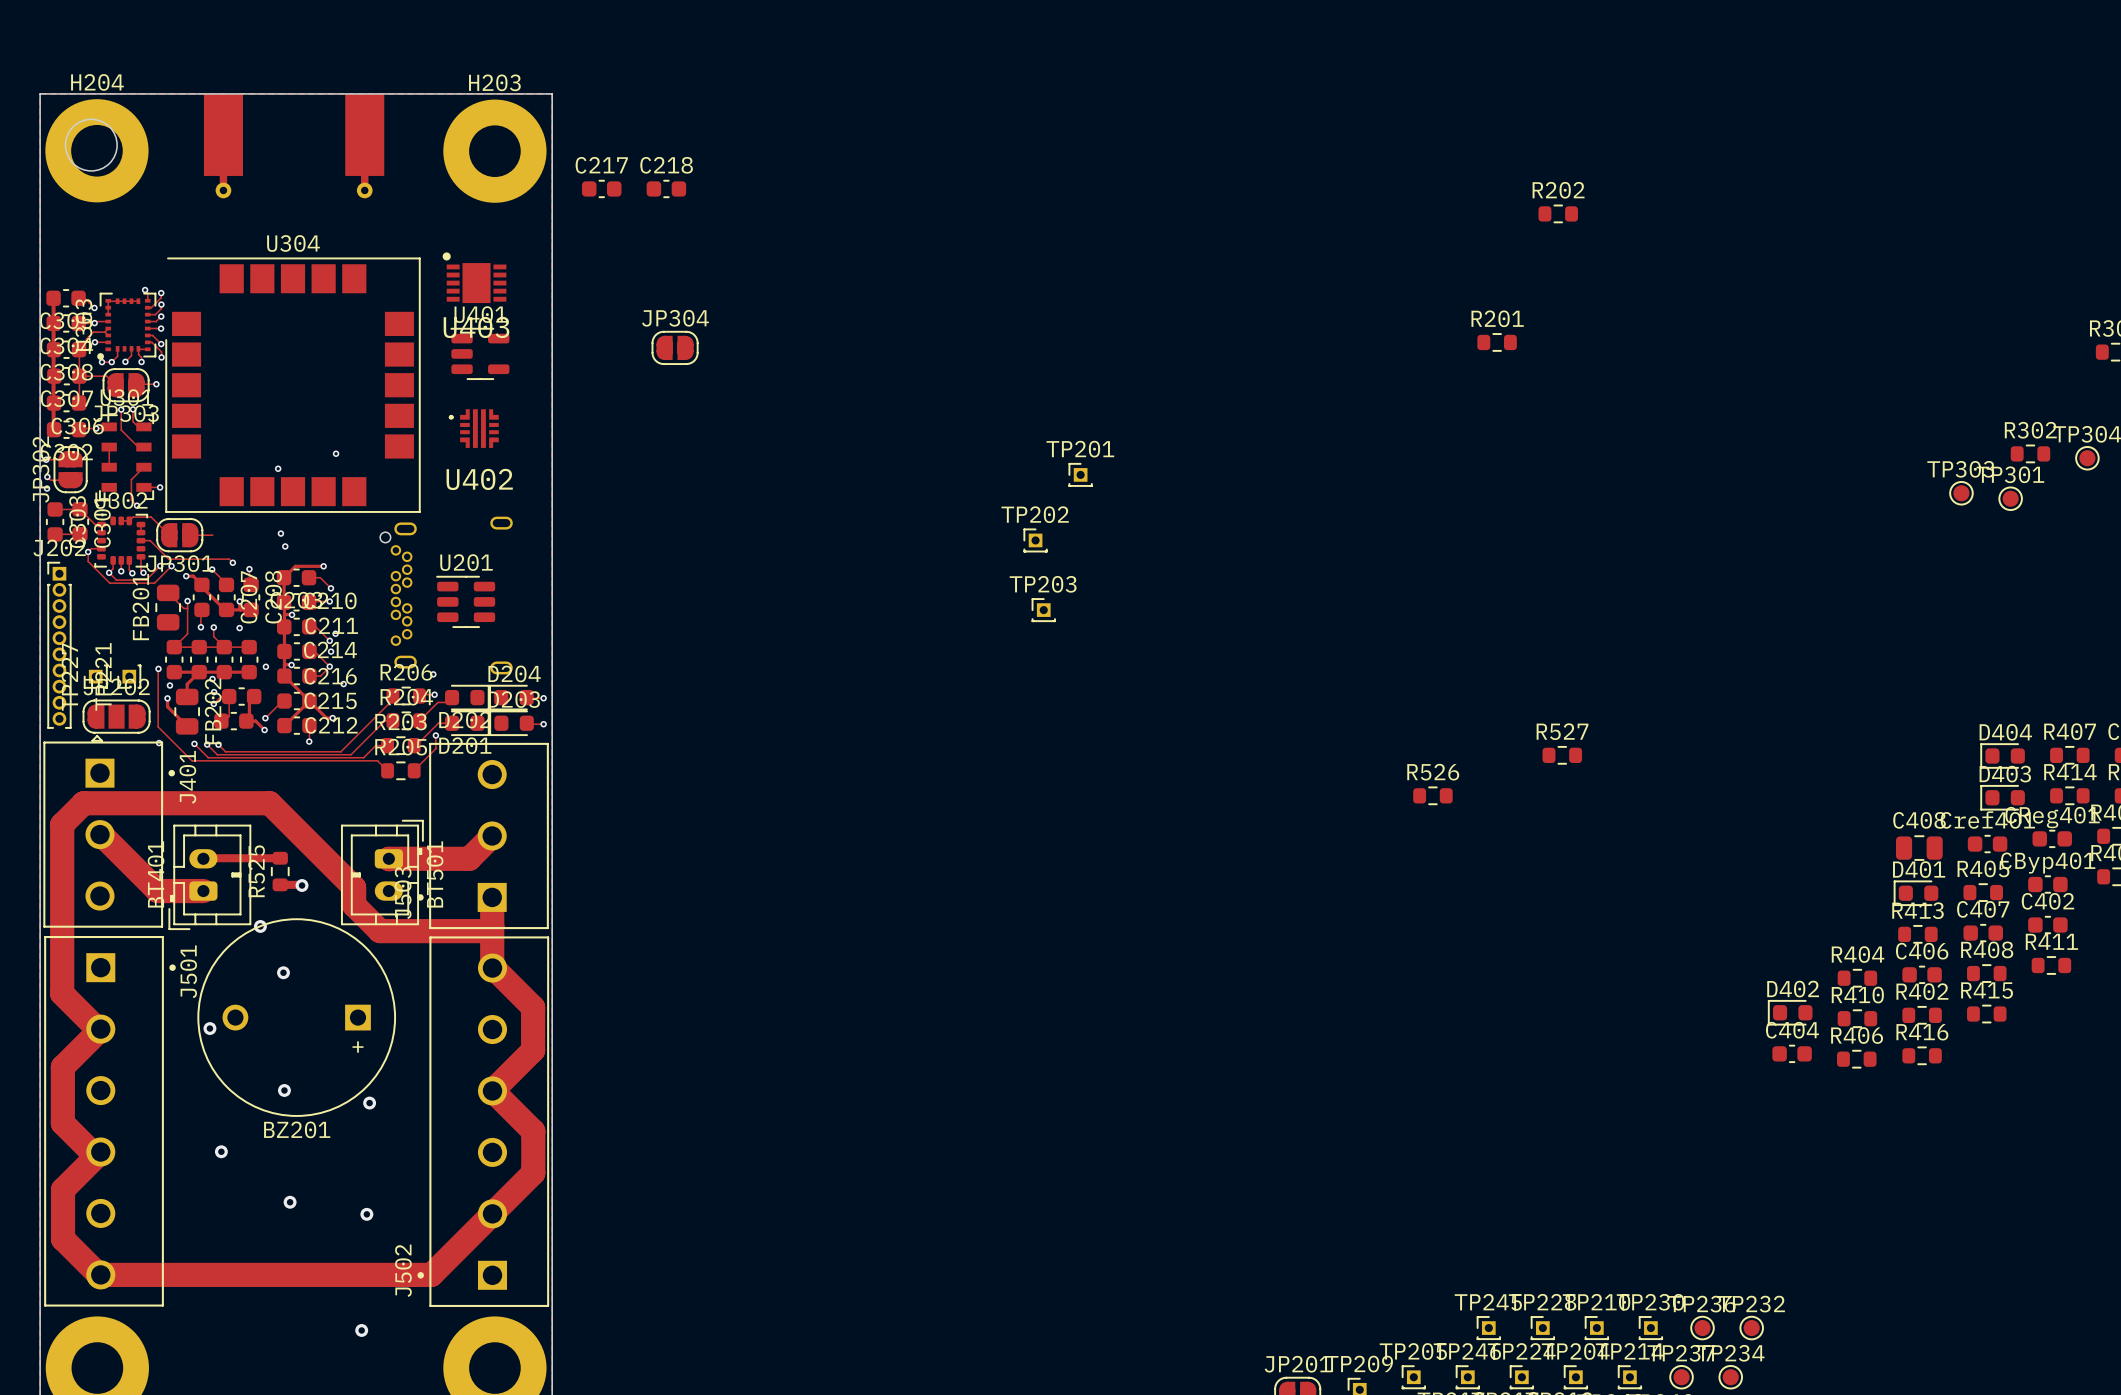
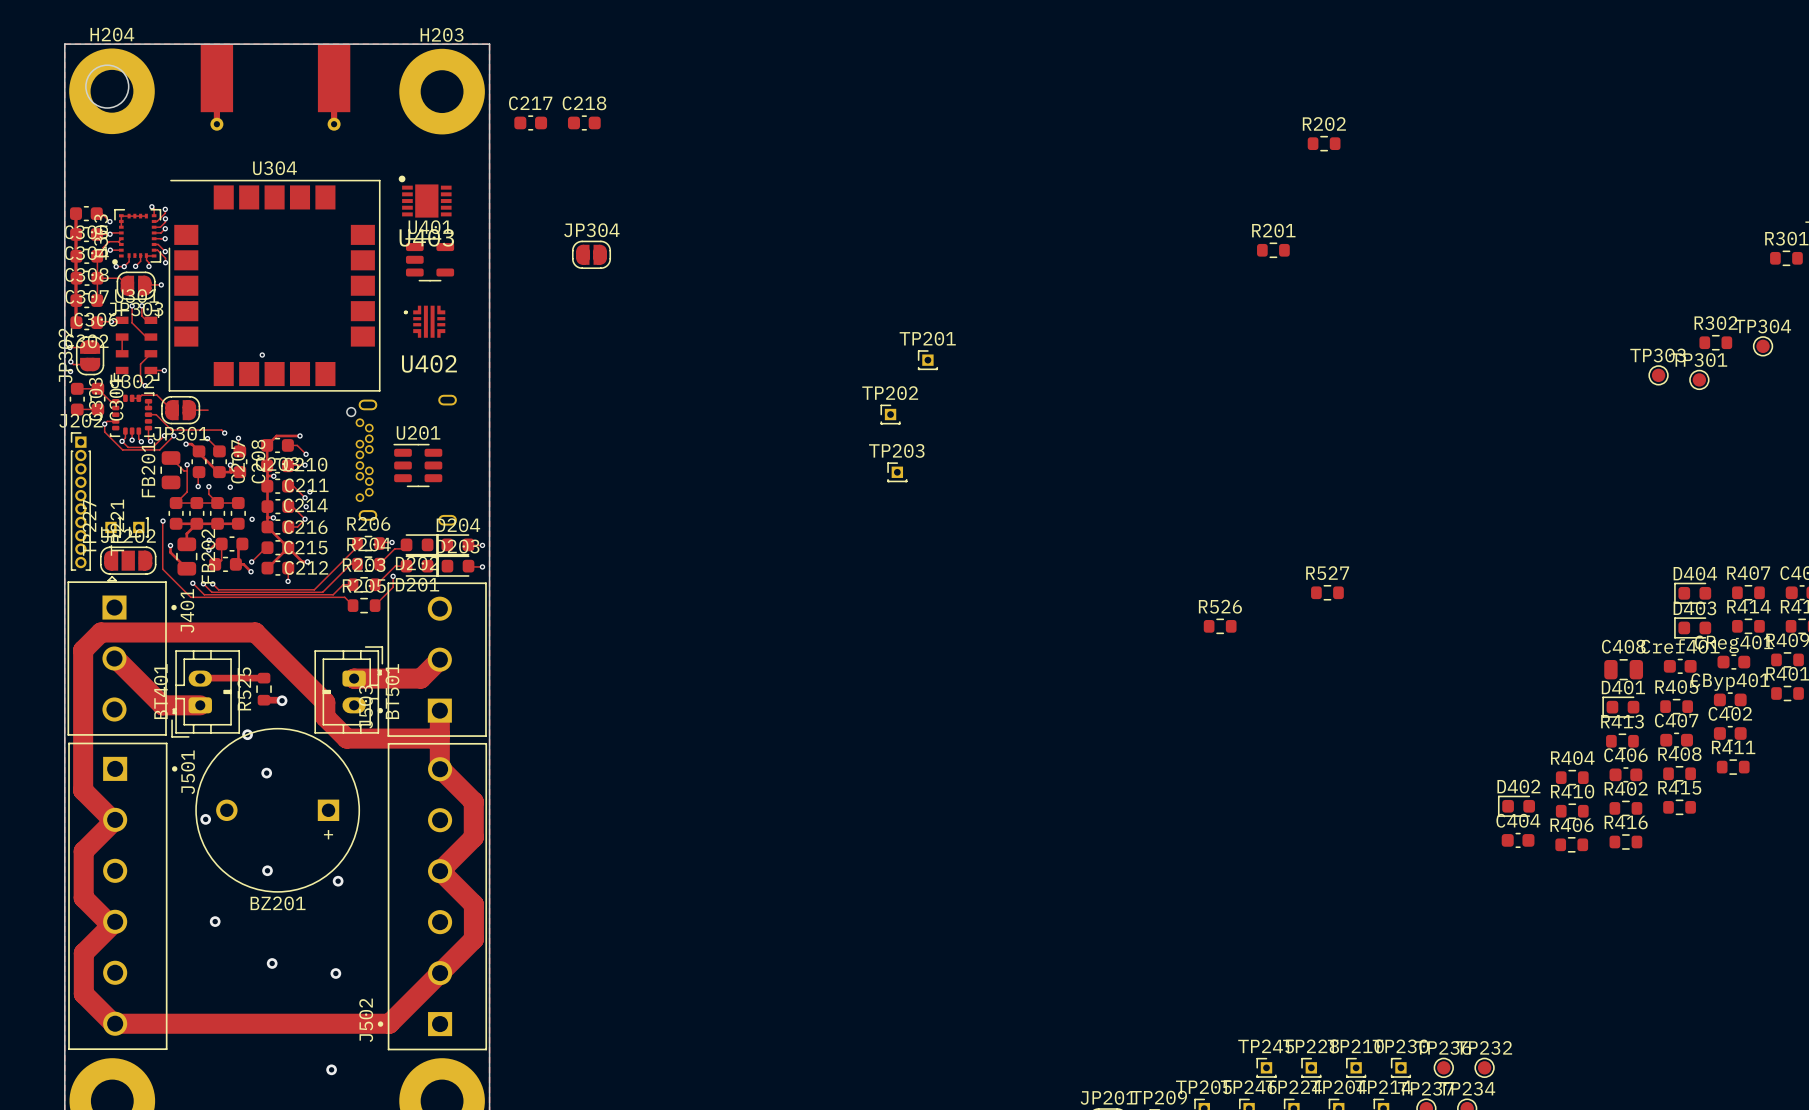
via: (336, 453) -> none
via: (280, 533) -> none
via: (285, 546) -> none
via: (433, 674) -> none
via: (212, 679) -> none
via: (343, 684) -> none
via: (169, 685) -> none
via: (159, 743) -> none

